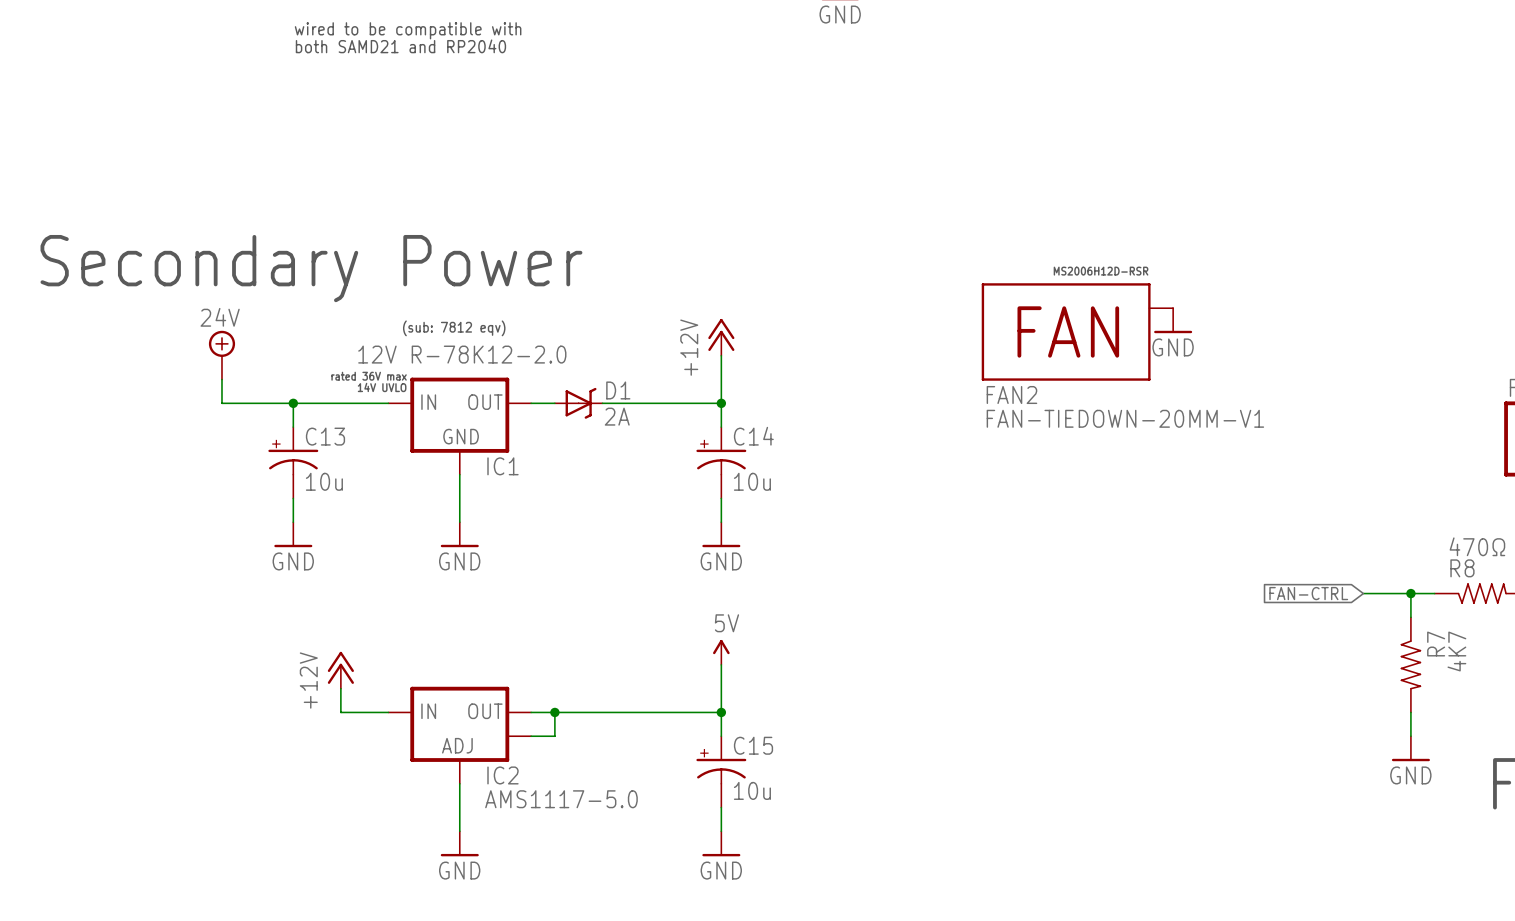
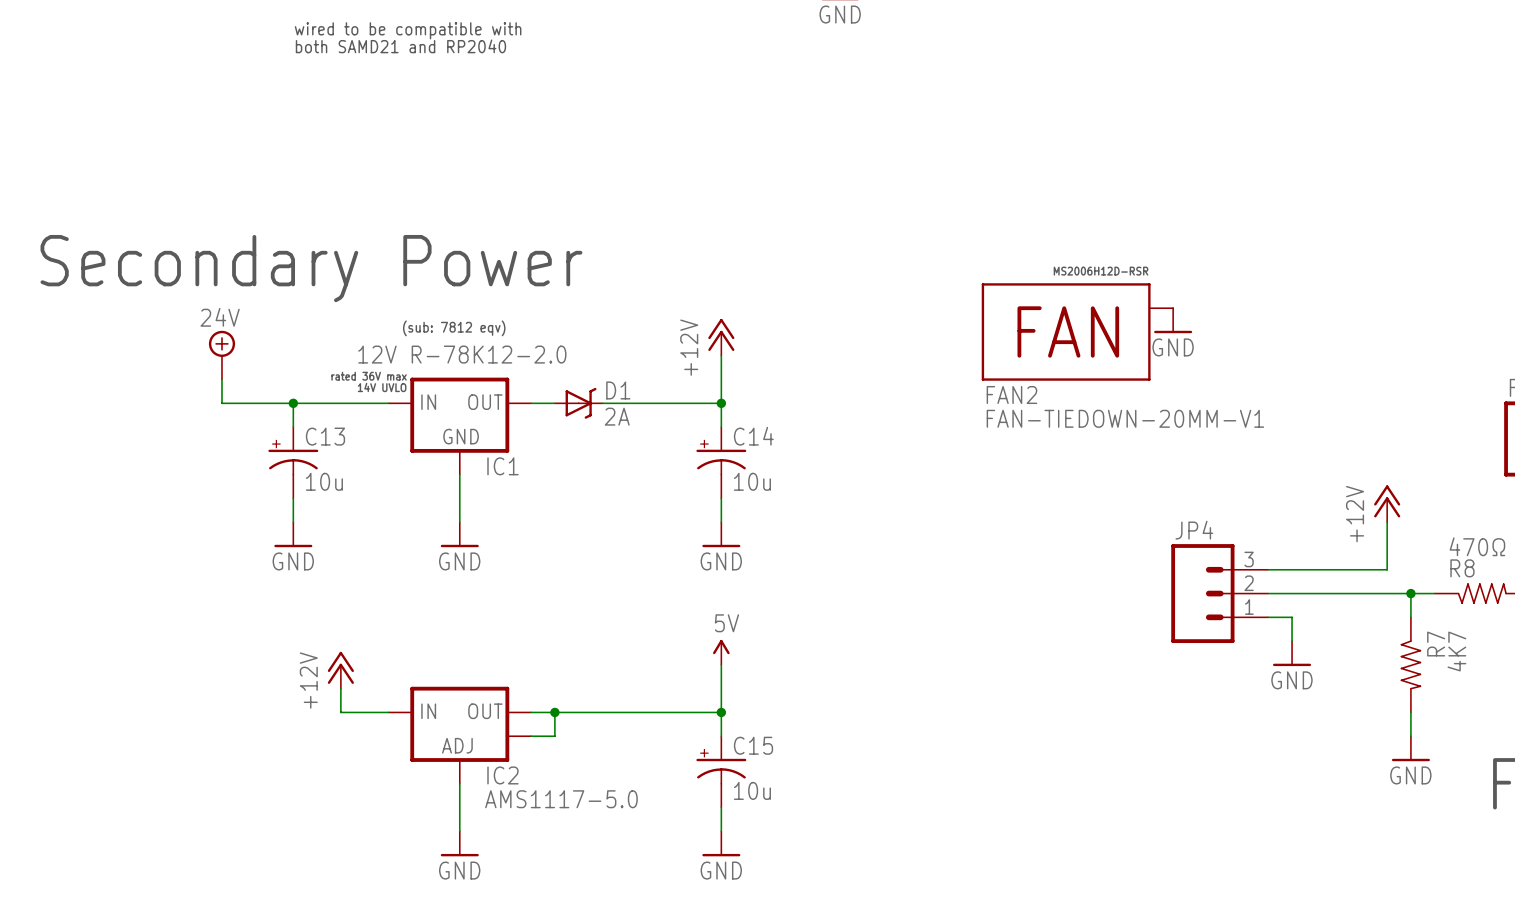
power symbol: none -> +12V (1387, 503)
wire: none -> (1387, 522) (1387, 569) (1268, 569)
JP4: none -> (1219, 593)
wire: none -> (1268, 593) (1363, 593)
global label: FAN-CTRL (1308, 593) -> none
wire: none -> (1268, 617) (1292, 617) (1292, 641)
power symbol: none -> GND (1292, 653)

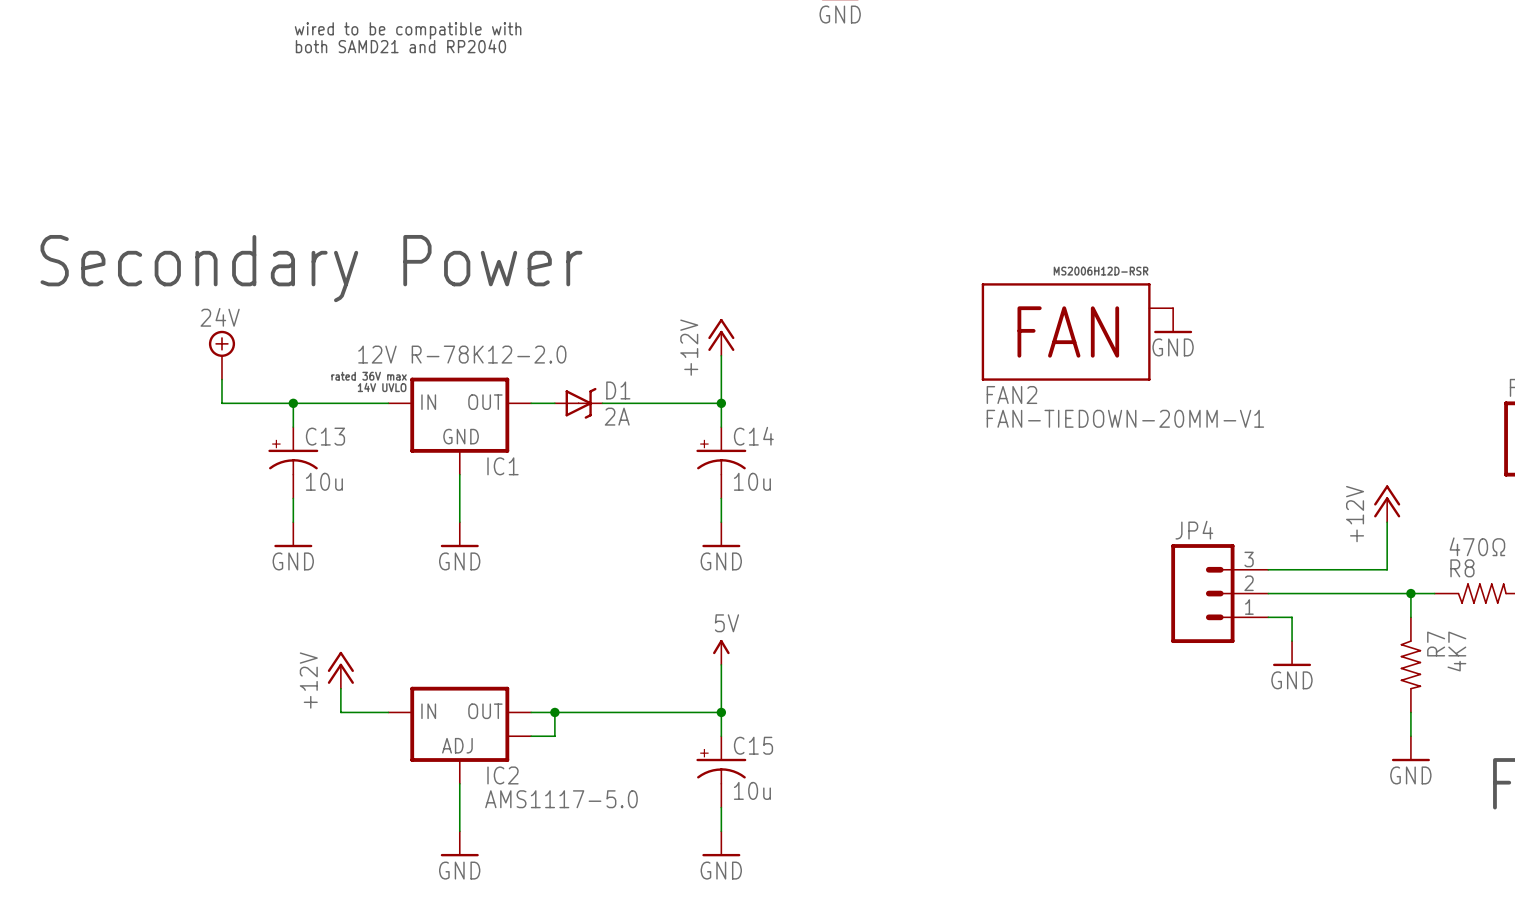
text: (sub: 7812 eqv) (454, 328) -> none

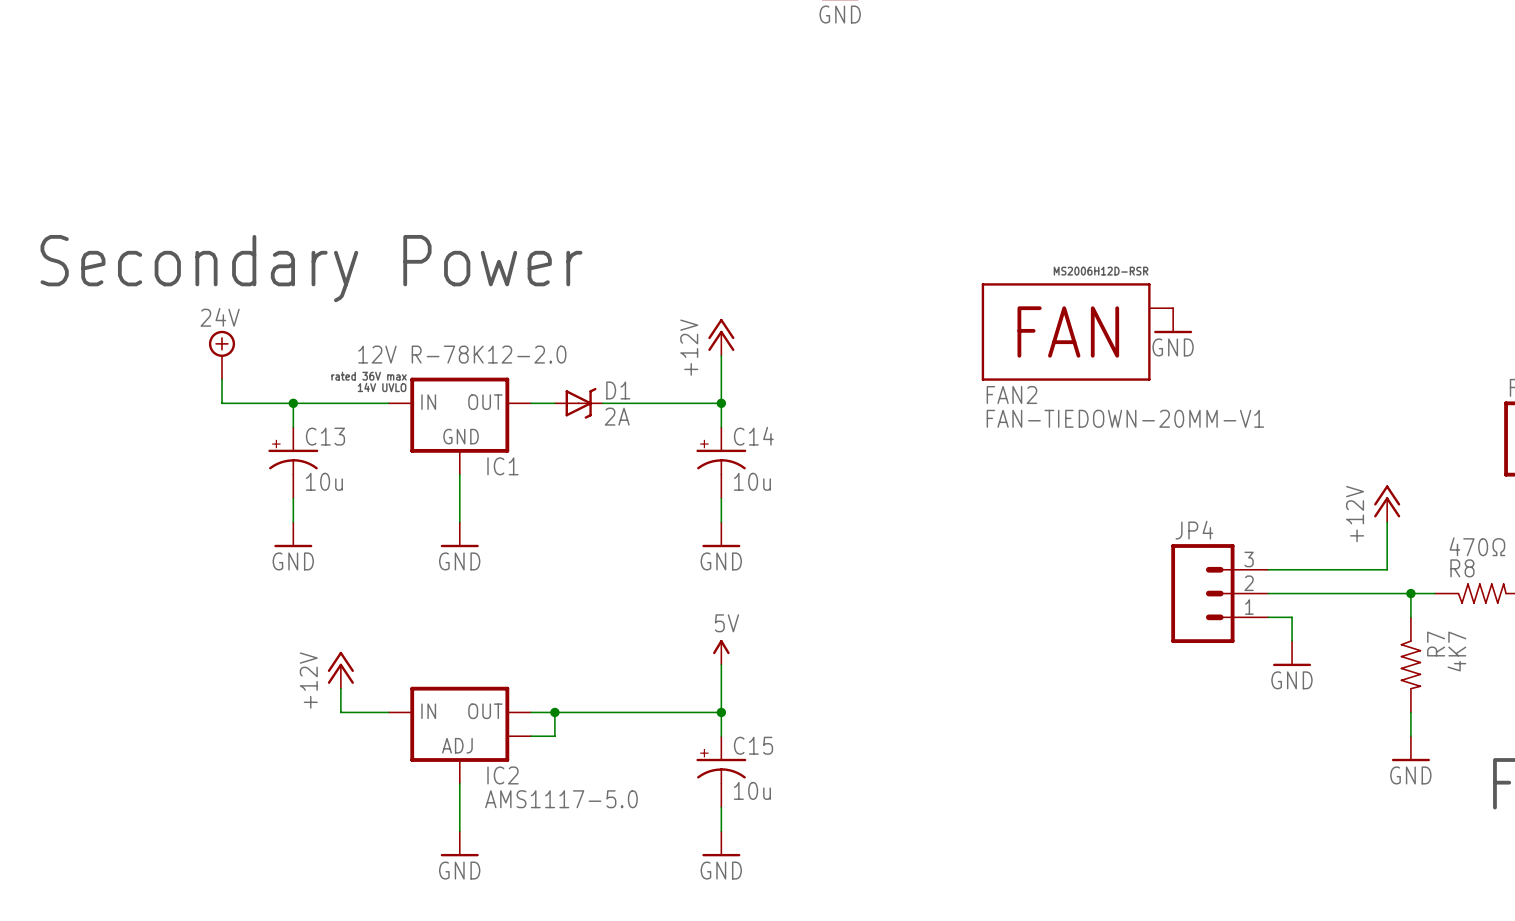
text: wired to be compatible with (408, 30) -> none
text: both SAMD21 and RP2040 (400, 46) -> none

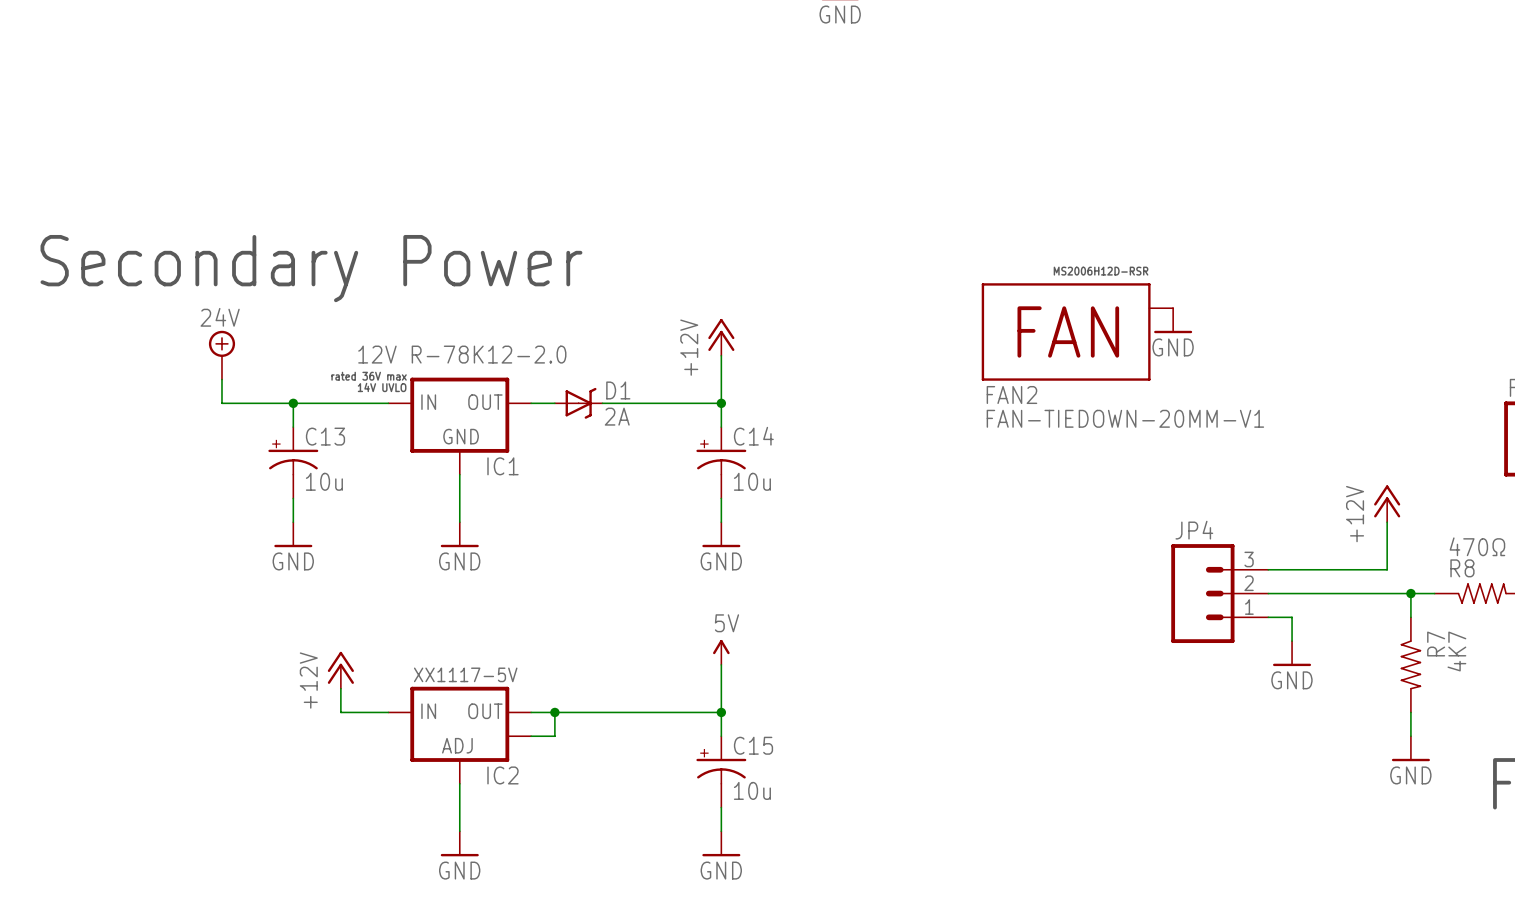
text: none -> XX1117-5V (465, 674)
IC2 value: AMS1117-5.0 (561, 799) -> none

